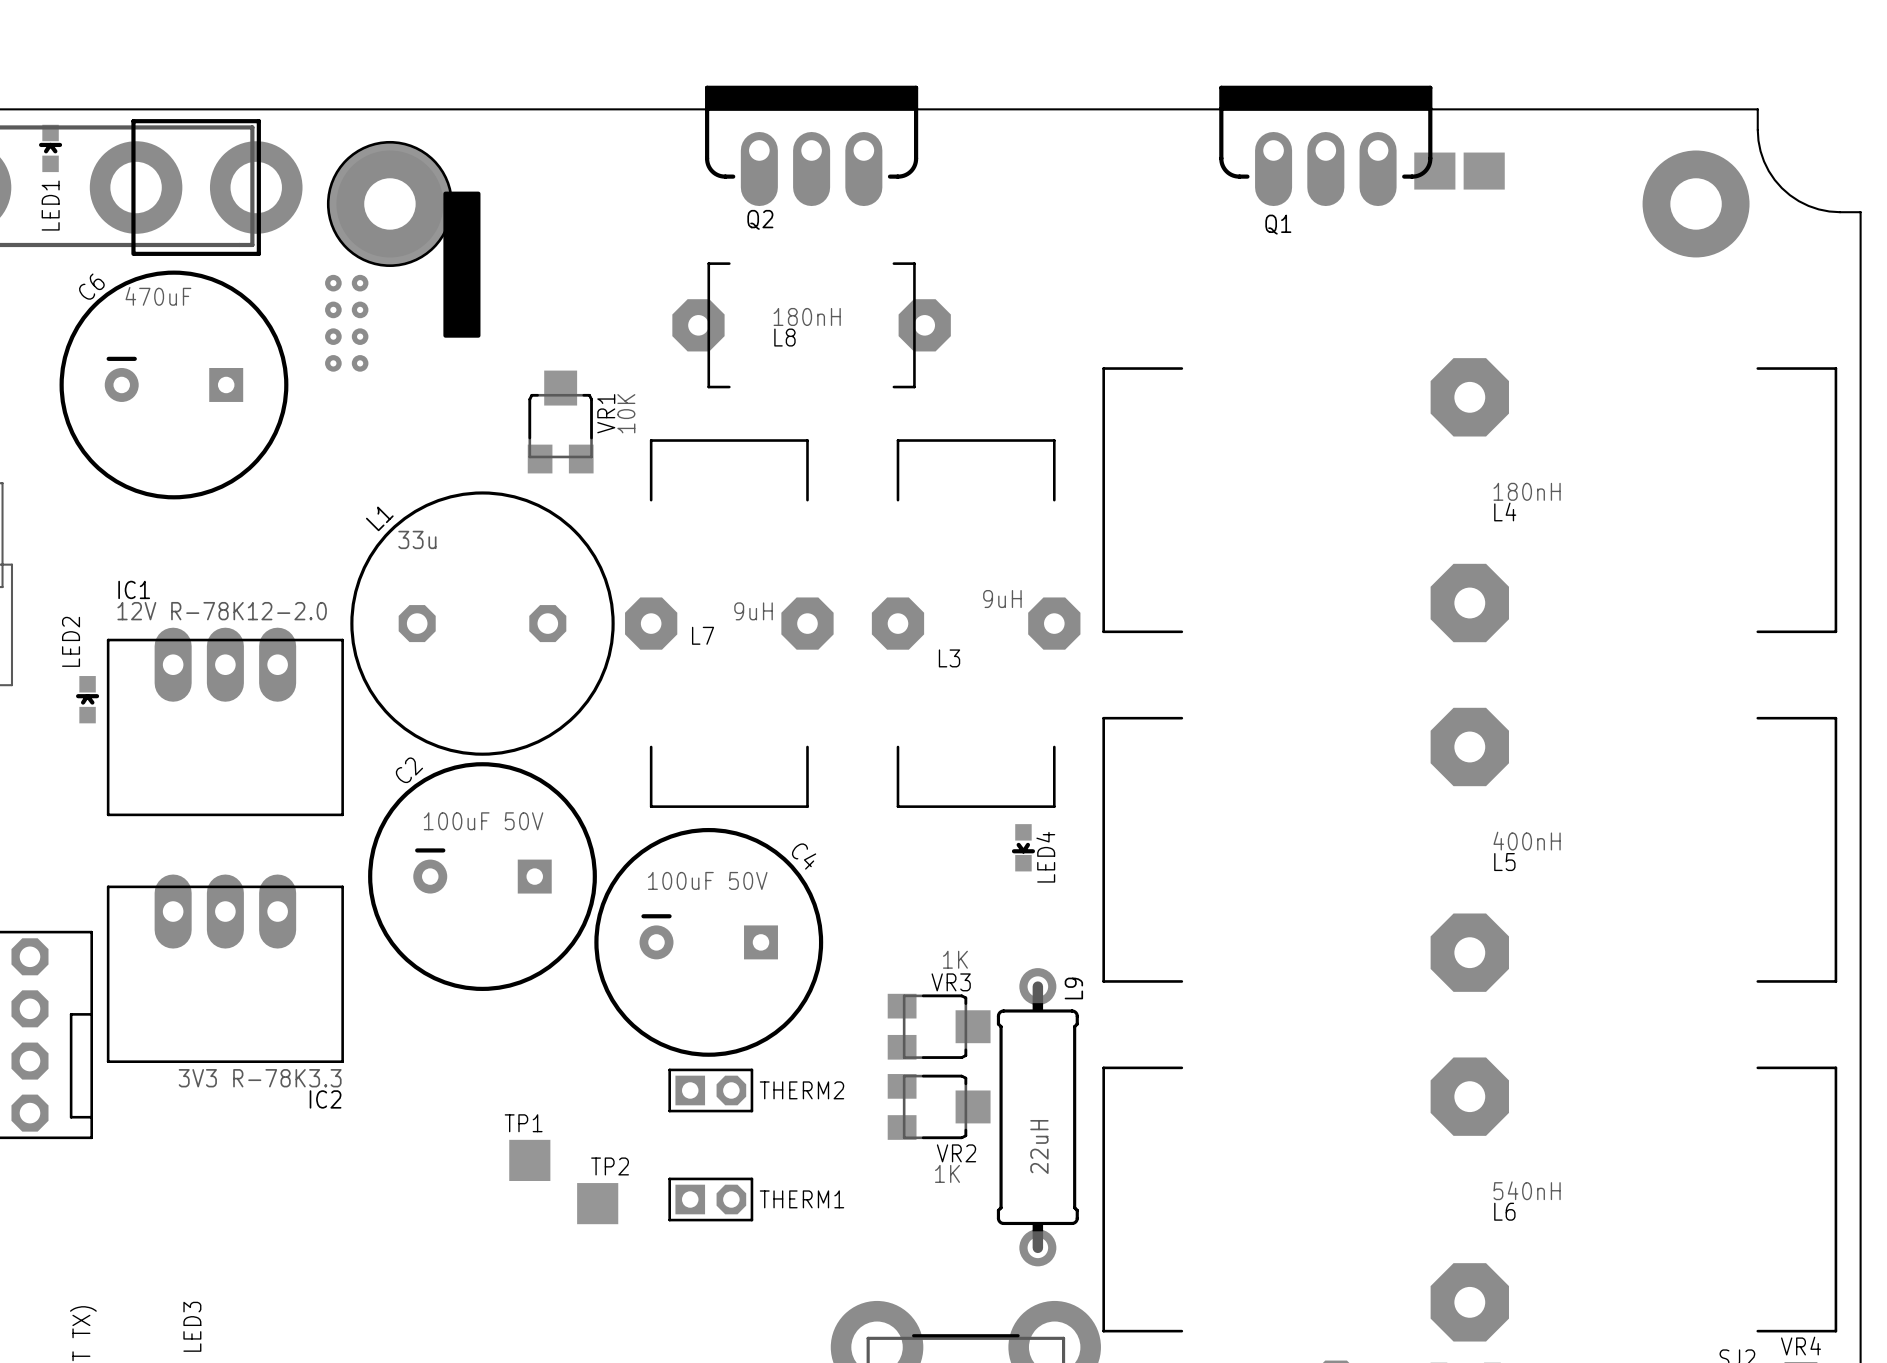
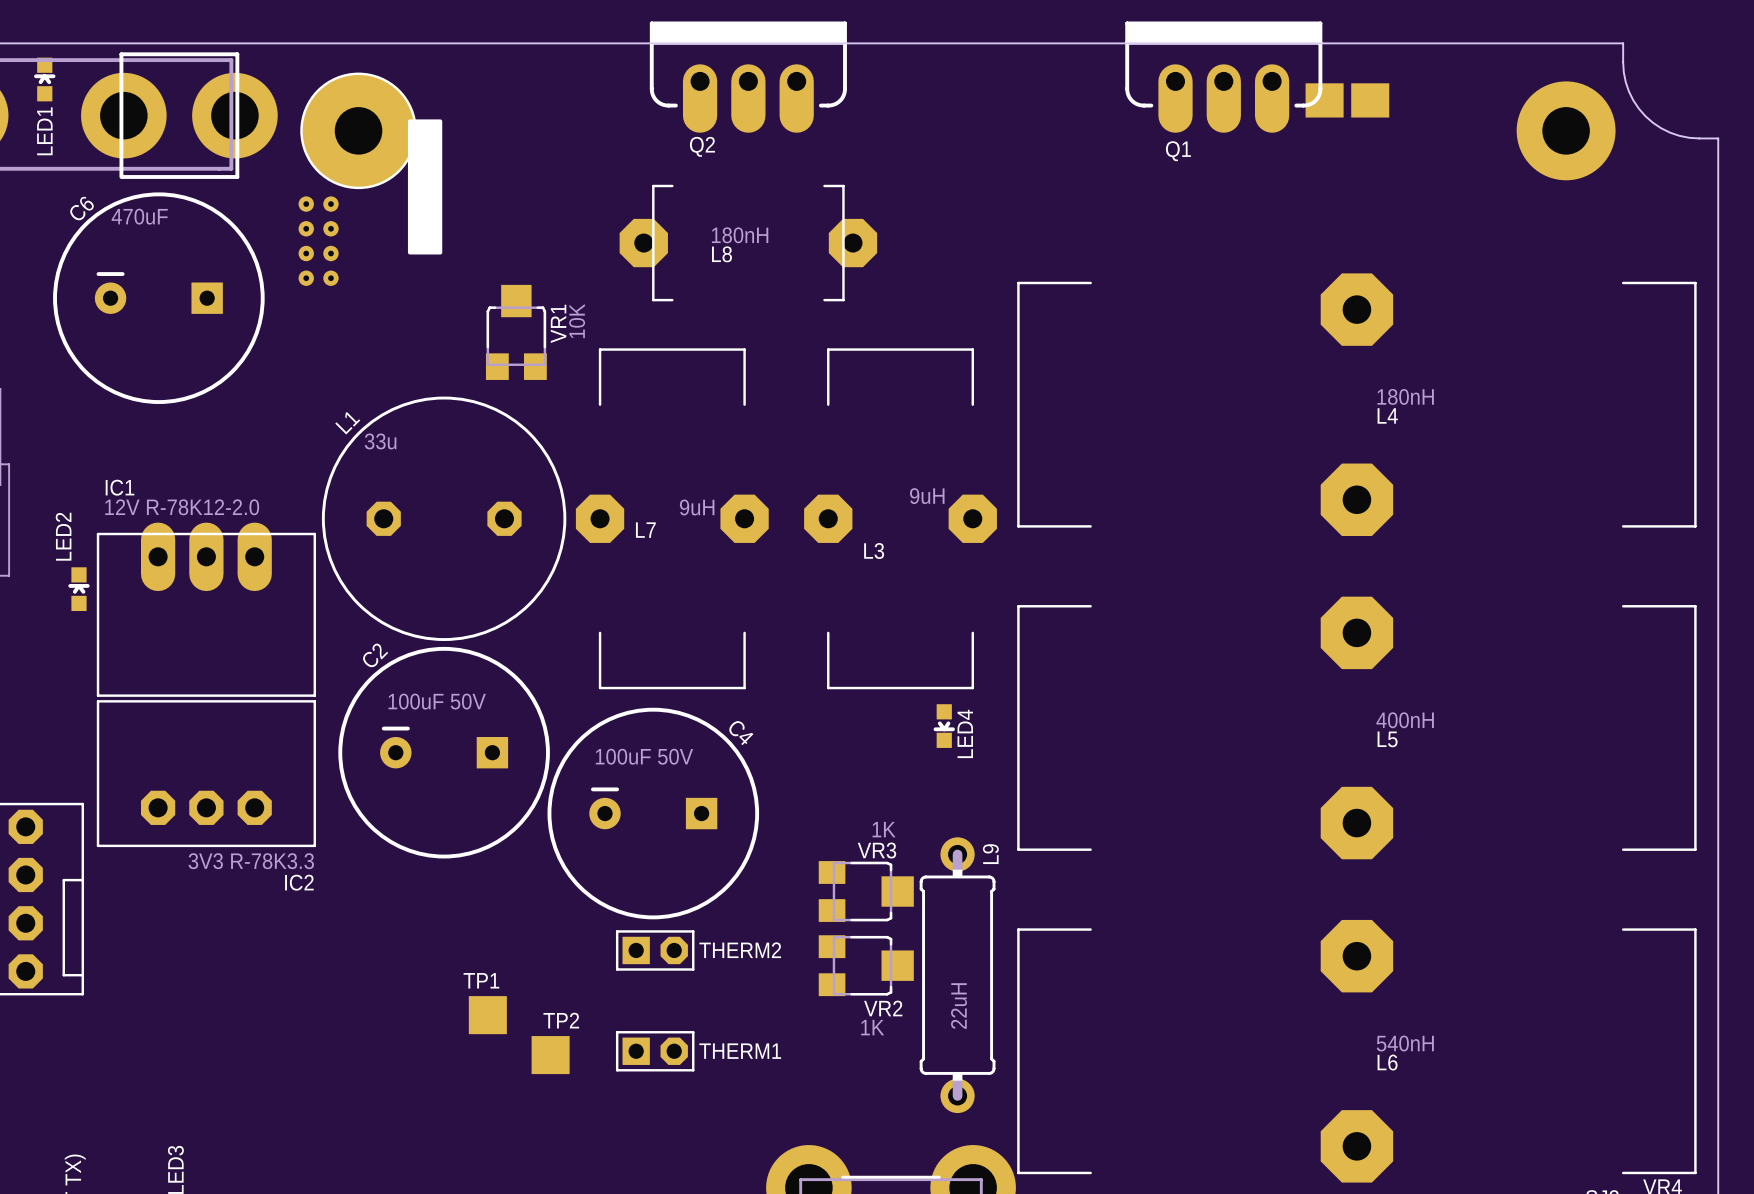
IC2 footprint: [106, 874, 344, 1064] -> [96, 700, 317, 848]

